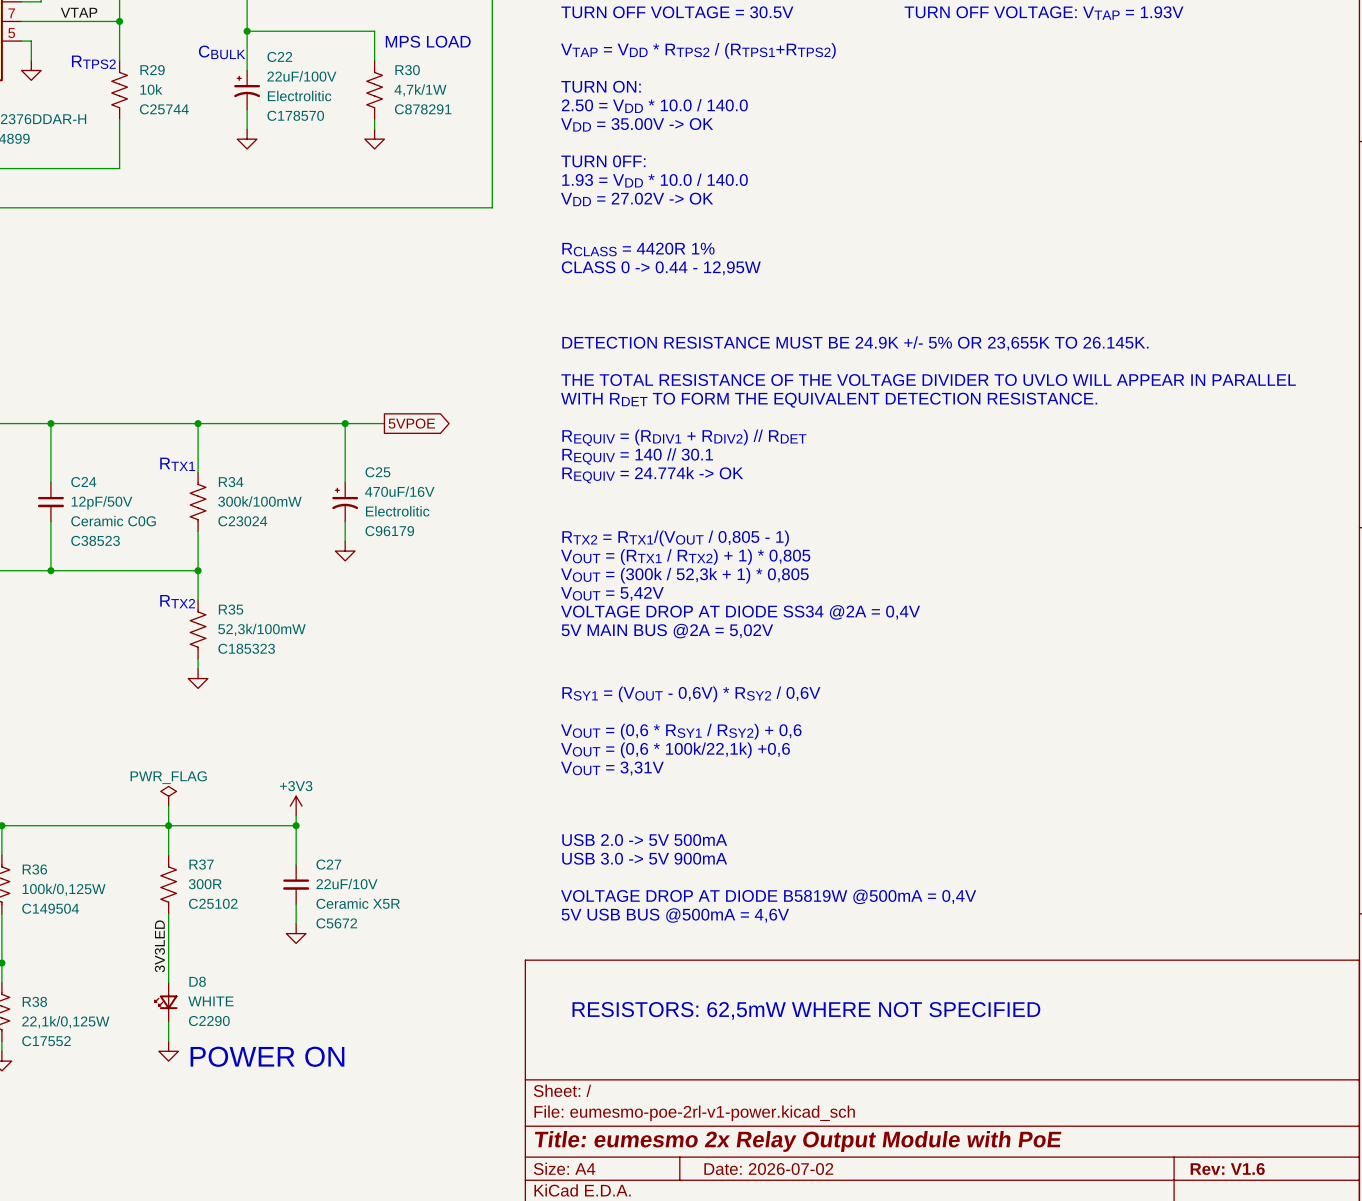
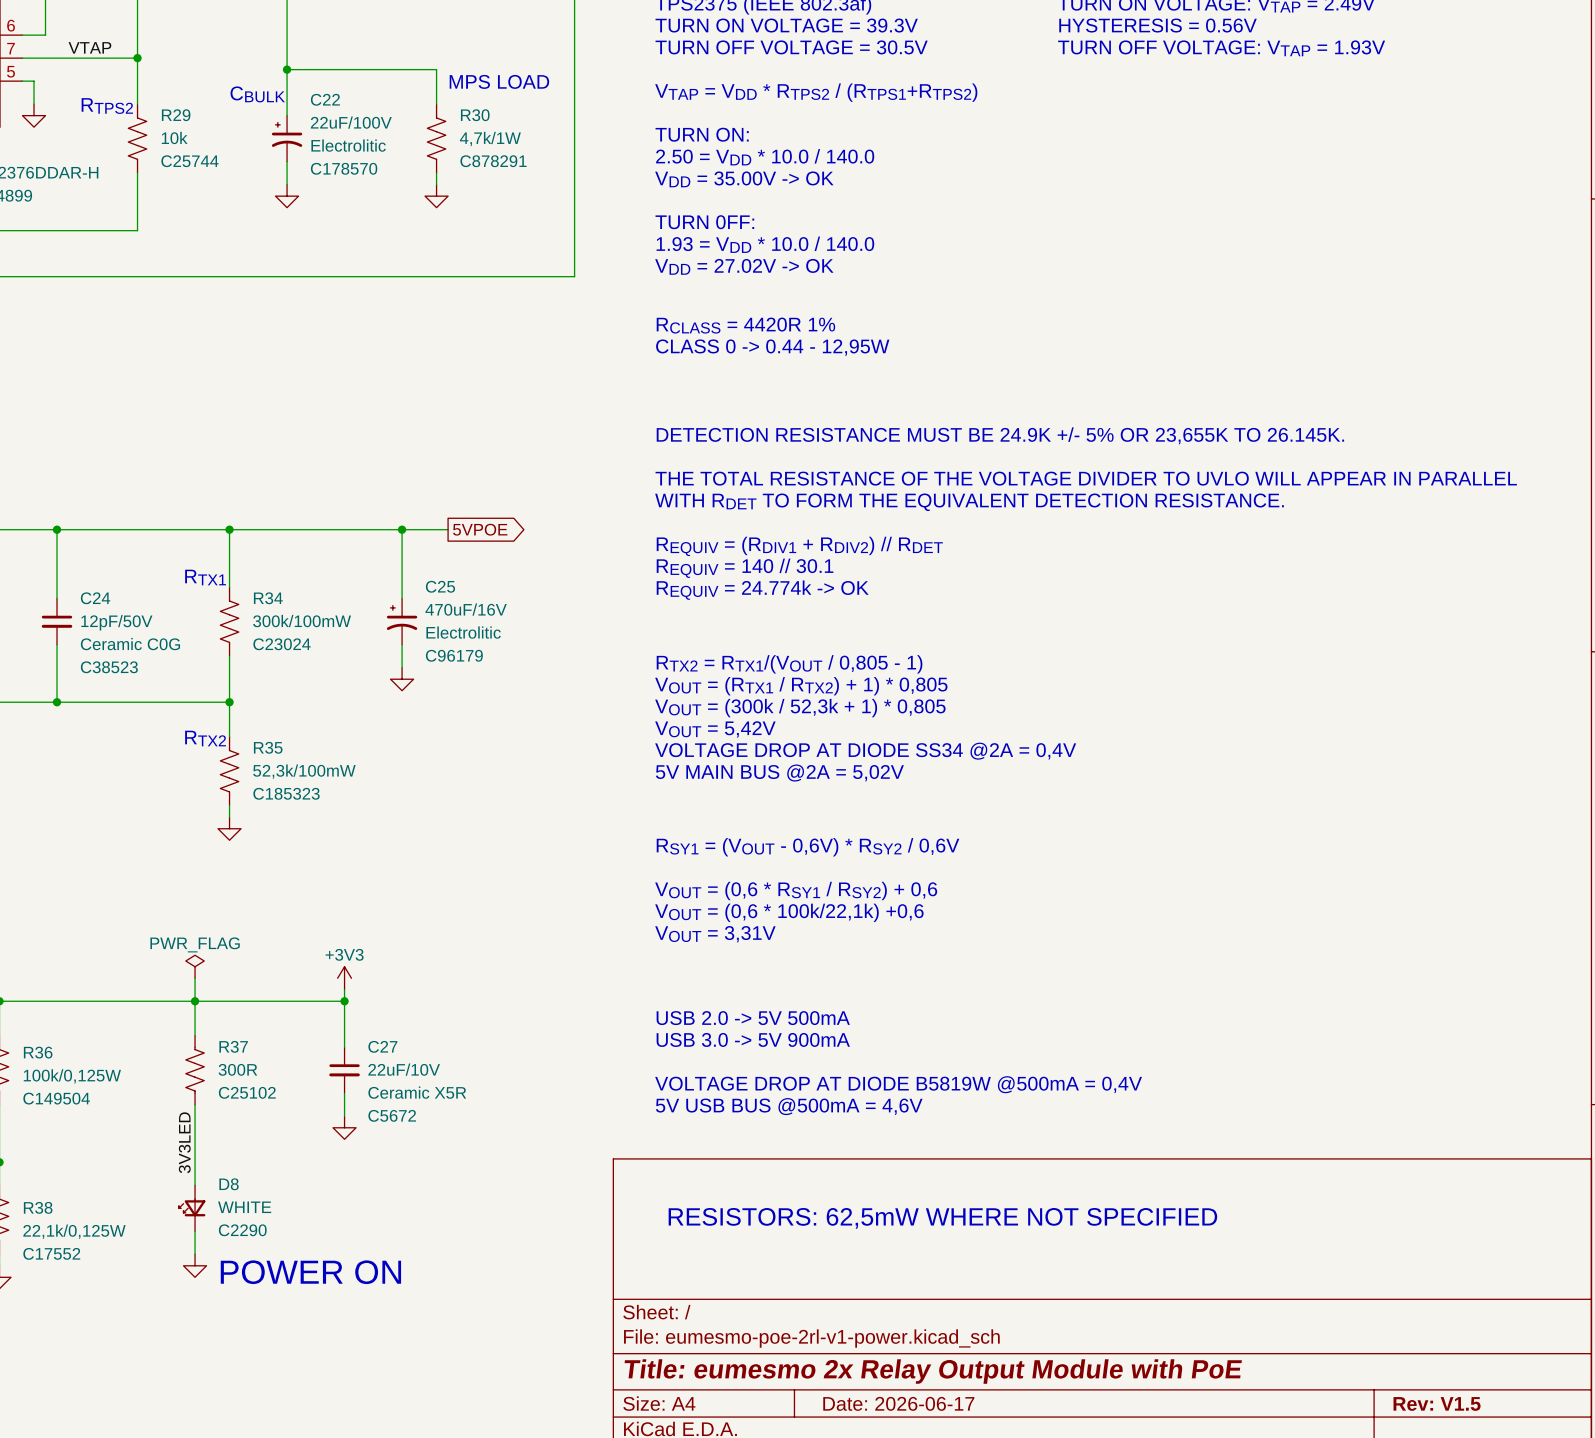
title block: Date: 2026-07-02 (768, 1169) -> Date: 2026-06-17 (898, 1403)
title block: Rev: V1.6 (1227, 1169) -> Rev: V1.5 (1437, 1403)

